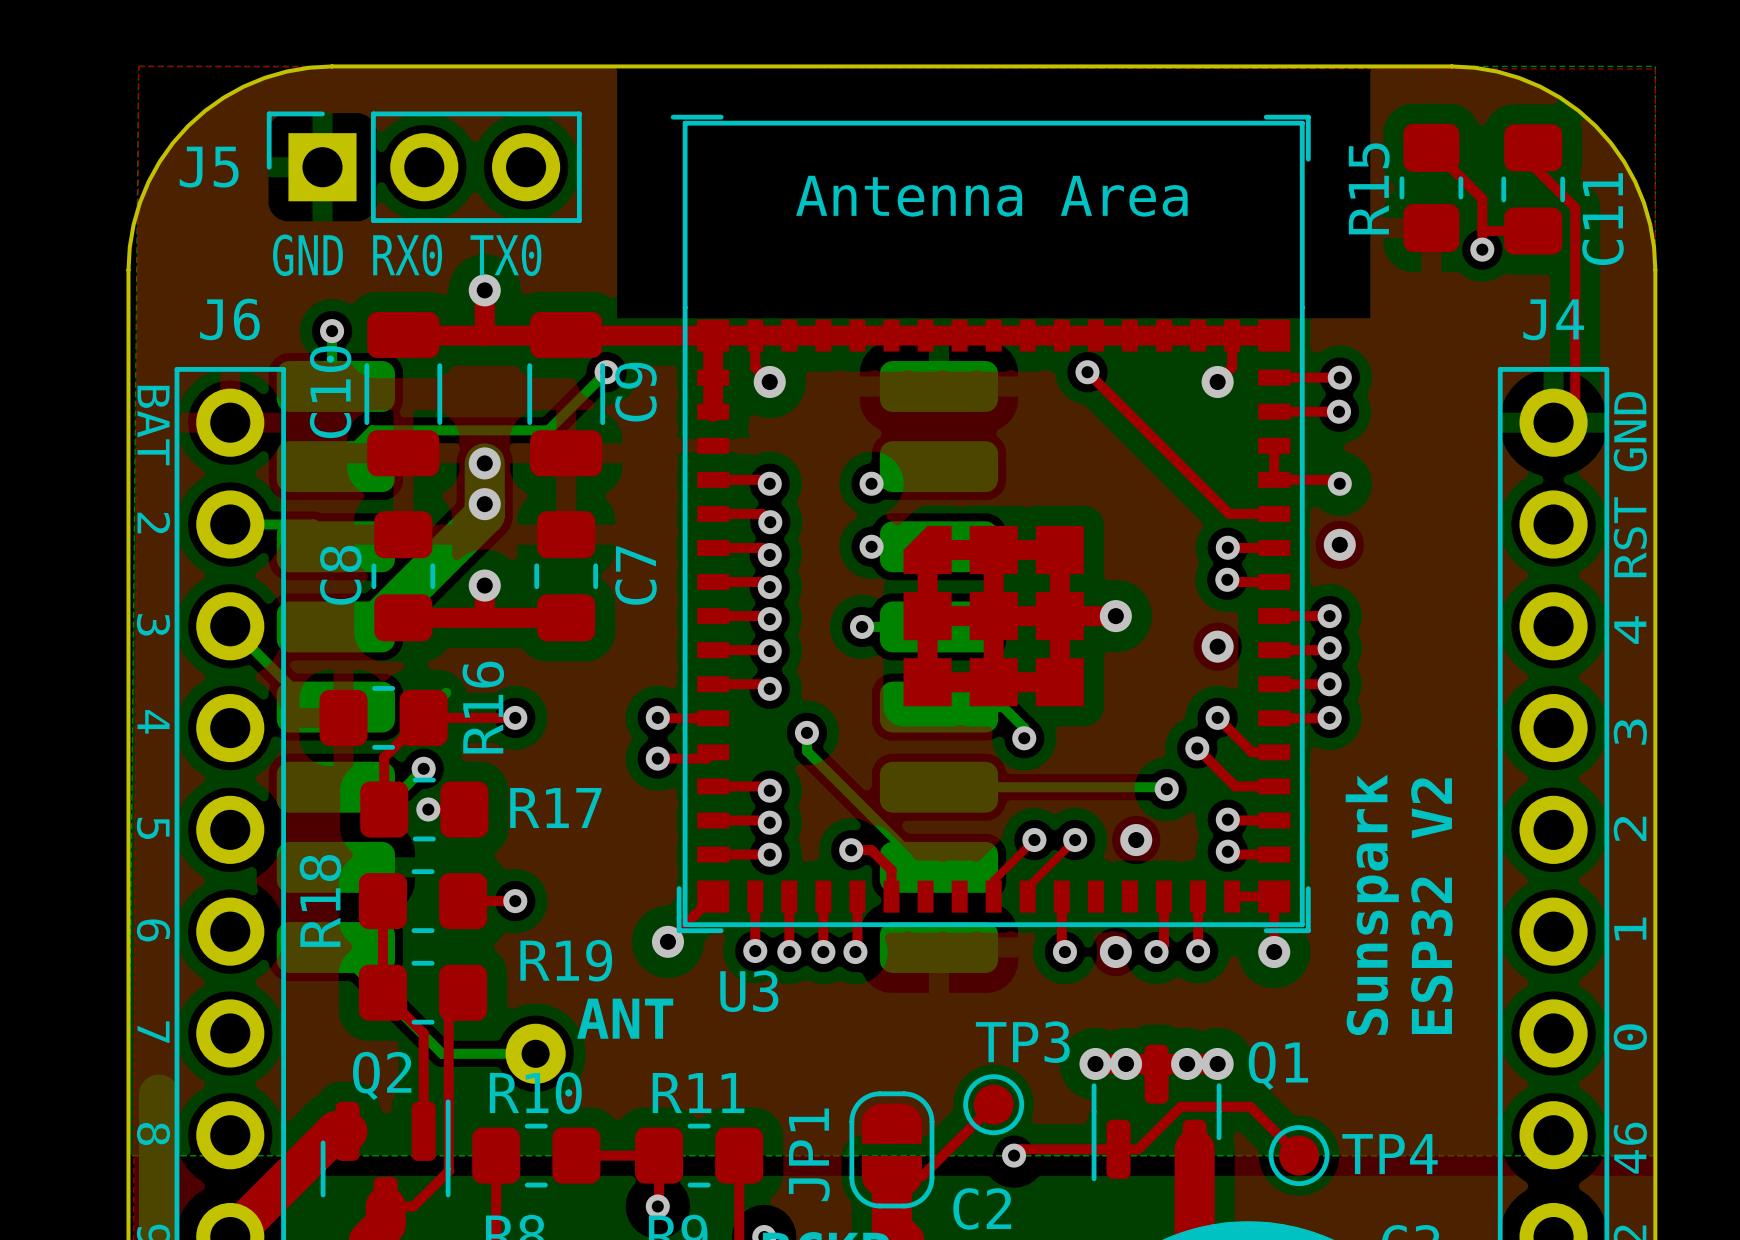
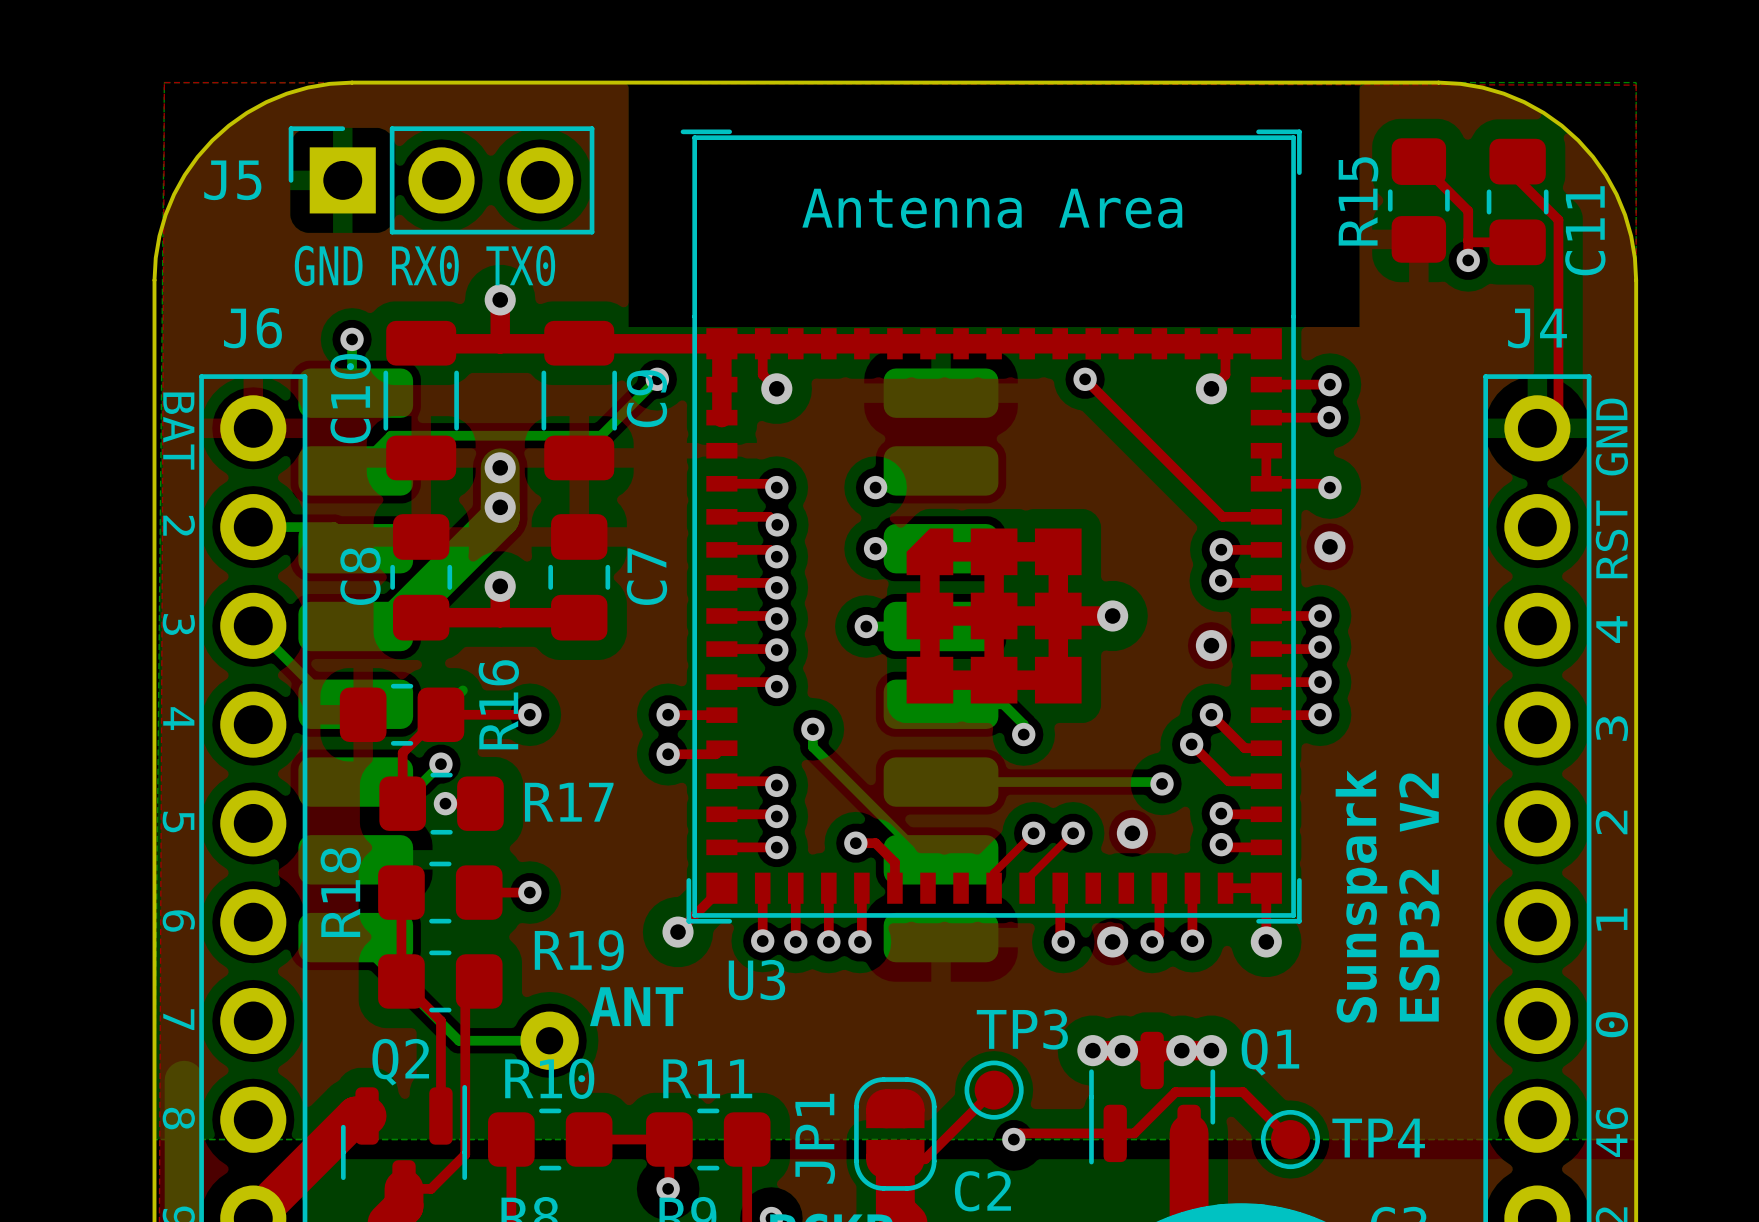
bottom track: (606, 372) (548, 430) -> (657, 379) (600, 435) (562, 435)
via position: (606, 372) -> (657, 379)

